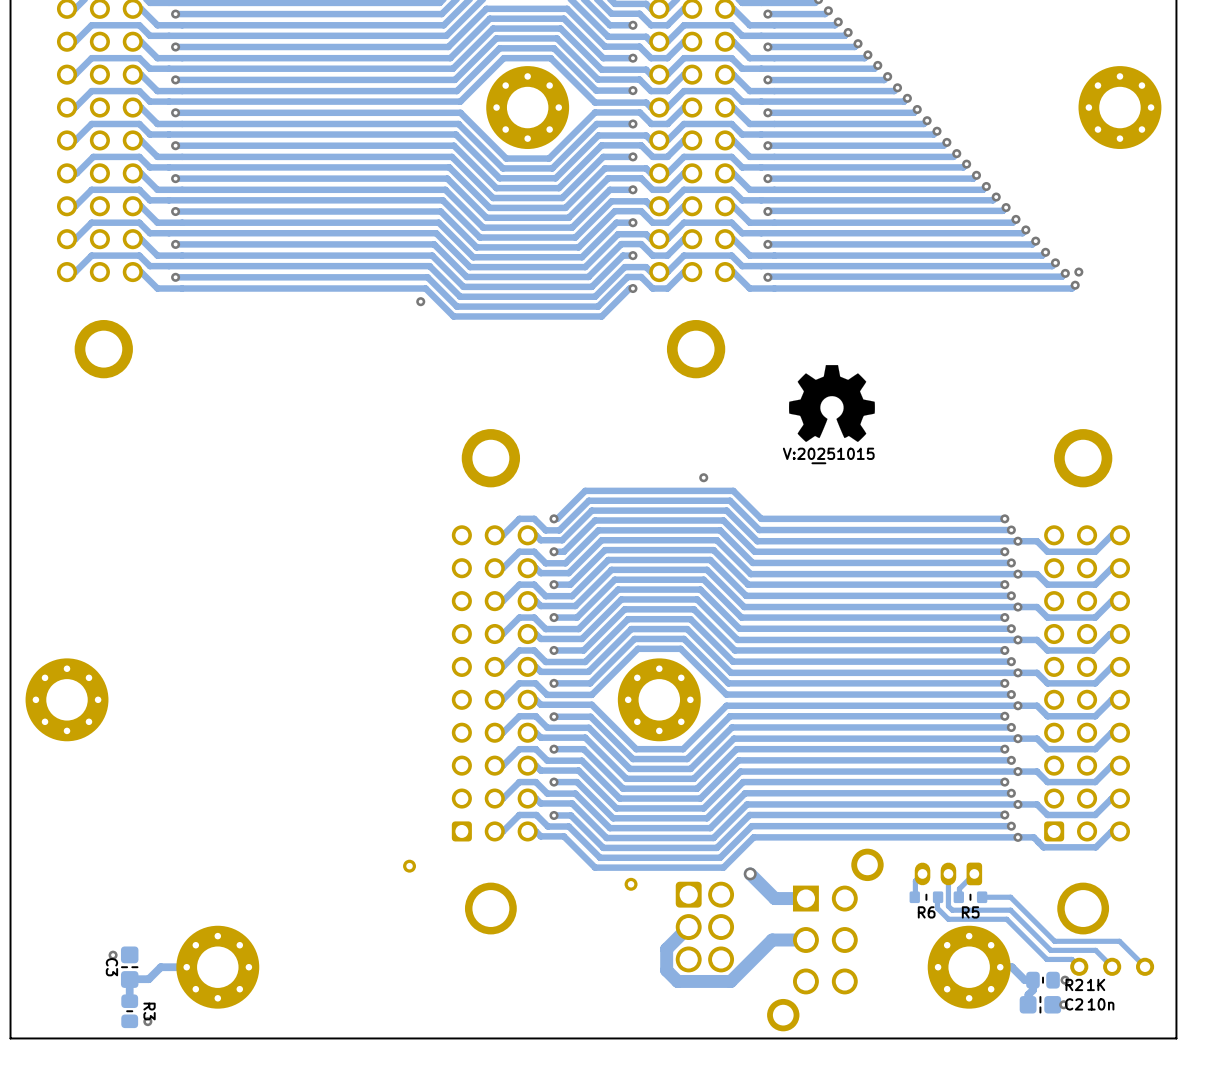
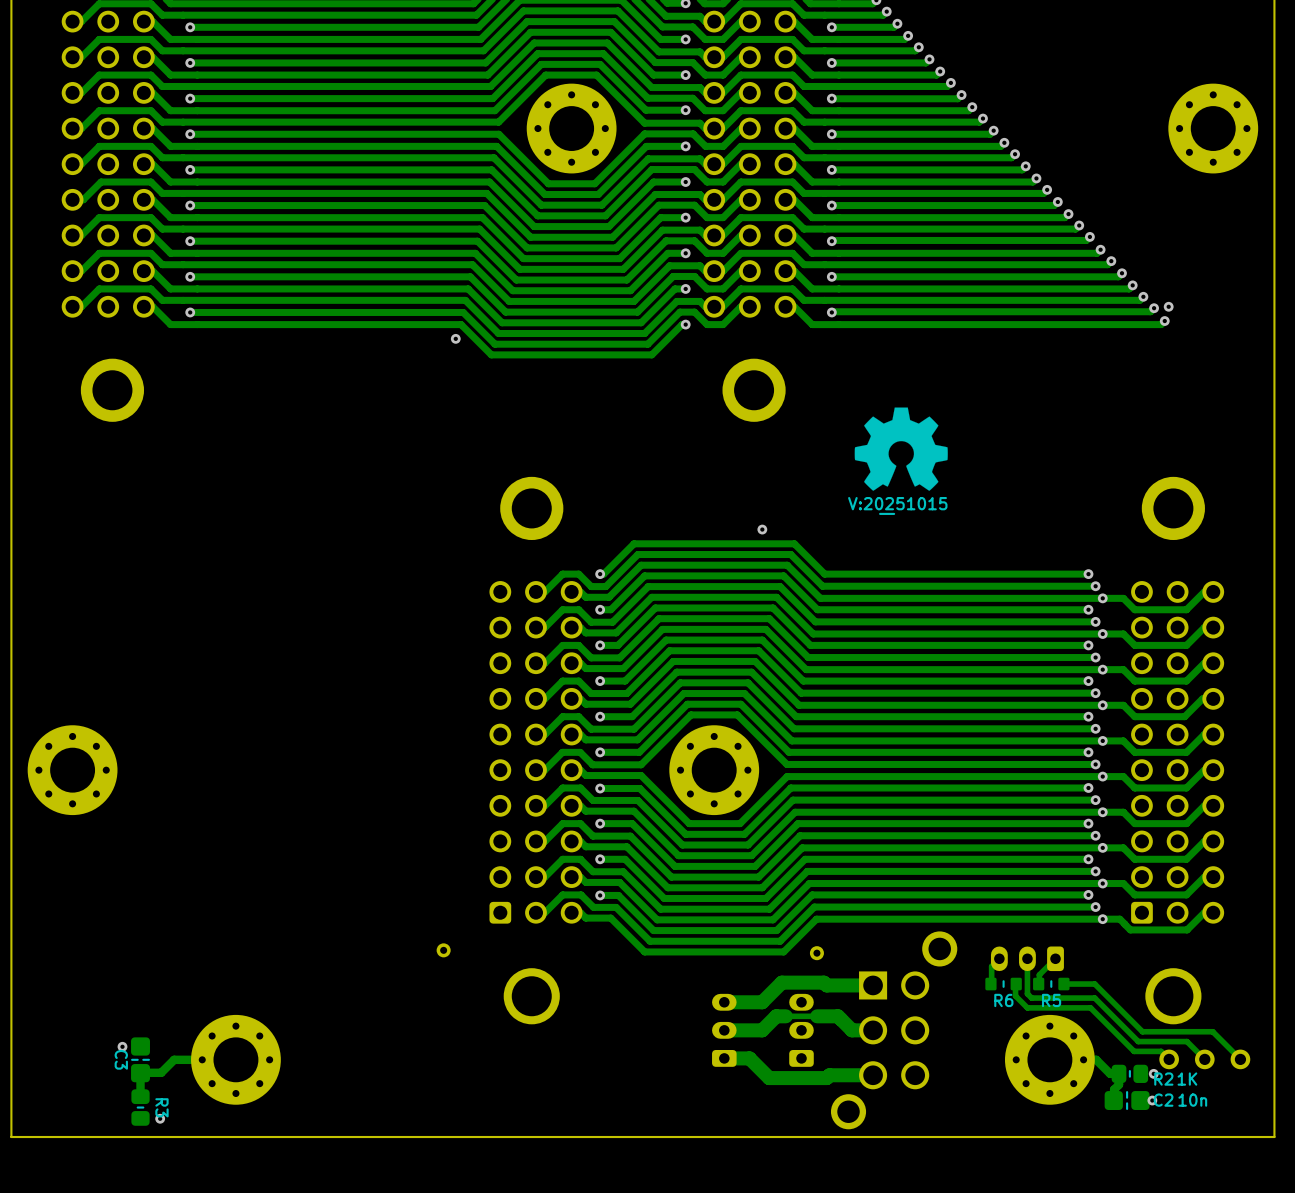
track: (750, 873) (774, 898) -> (724, 1002) (762, 1002) (781, 982) (823, 982) (826, 985) (839, 985)
via: (750, 873) -> none
part position: (631, 884) -> (816, 953)
track: (688, 927) (666, 949) (666, 970) (677, 981) (730, 981) (772, 940) (786, 940) -> (724, 1030) (762, 1030) (776, 1016) (837, 1016) (852, 1030)
part: (704, 927) -> none
part: none -> (724, 1030)
part: none -> (801, 1030)
track: none -> (724, 1058) (749, 1058) (769, 1078) (826, 1078) (829, 1075) (873, 1075)

